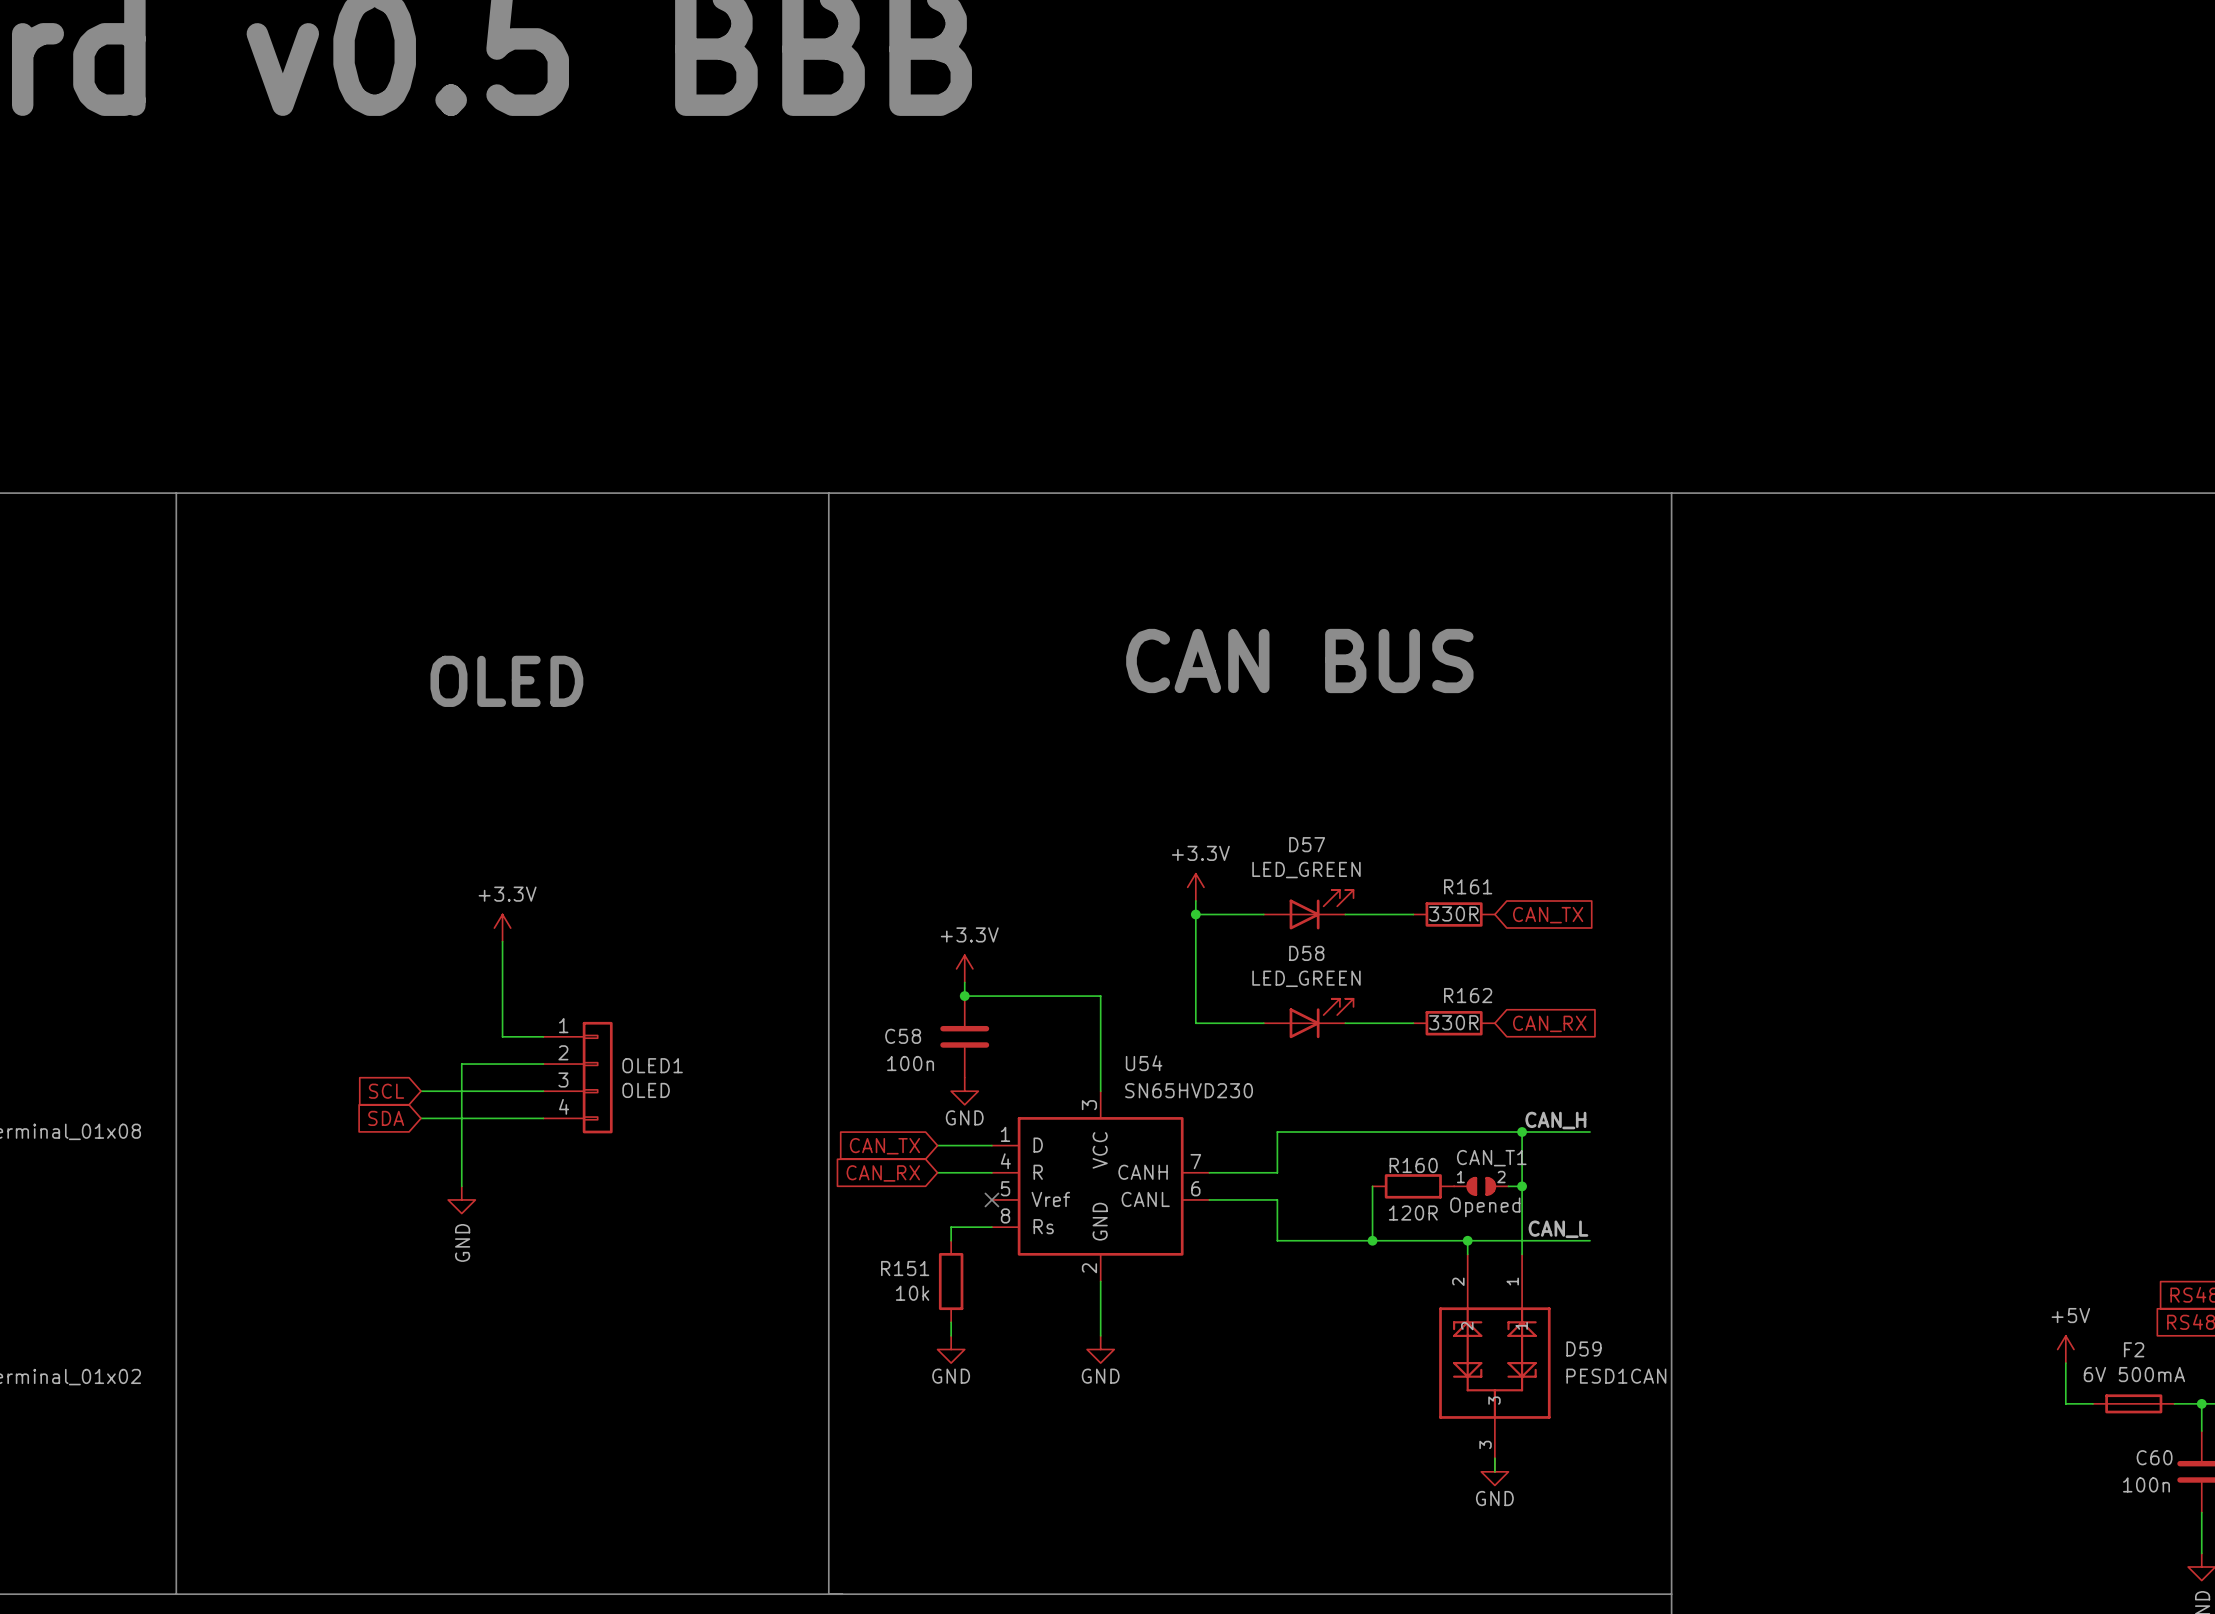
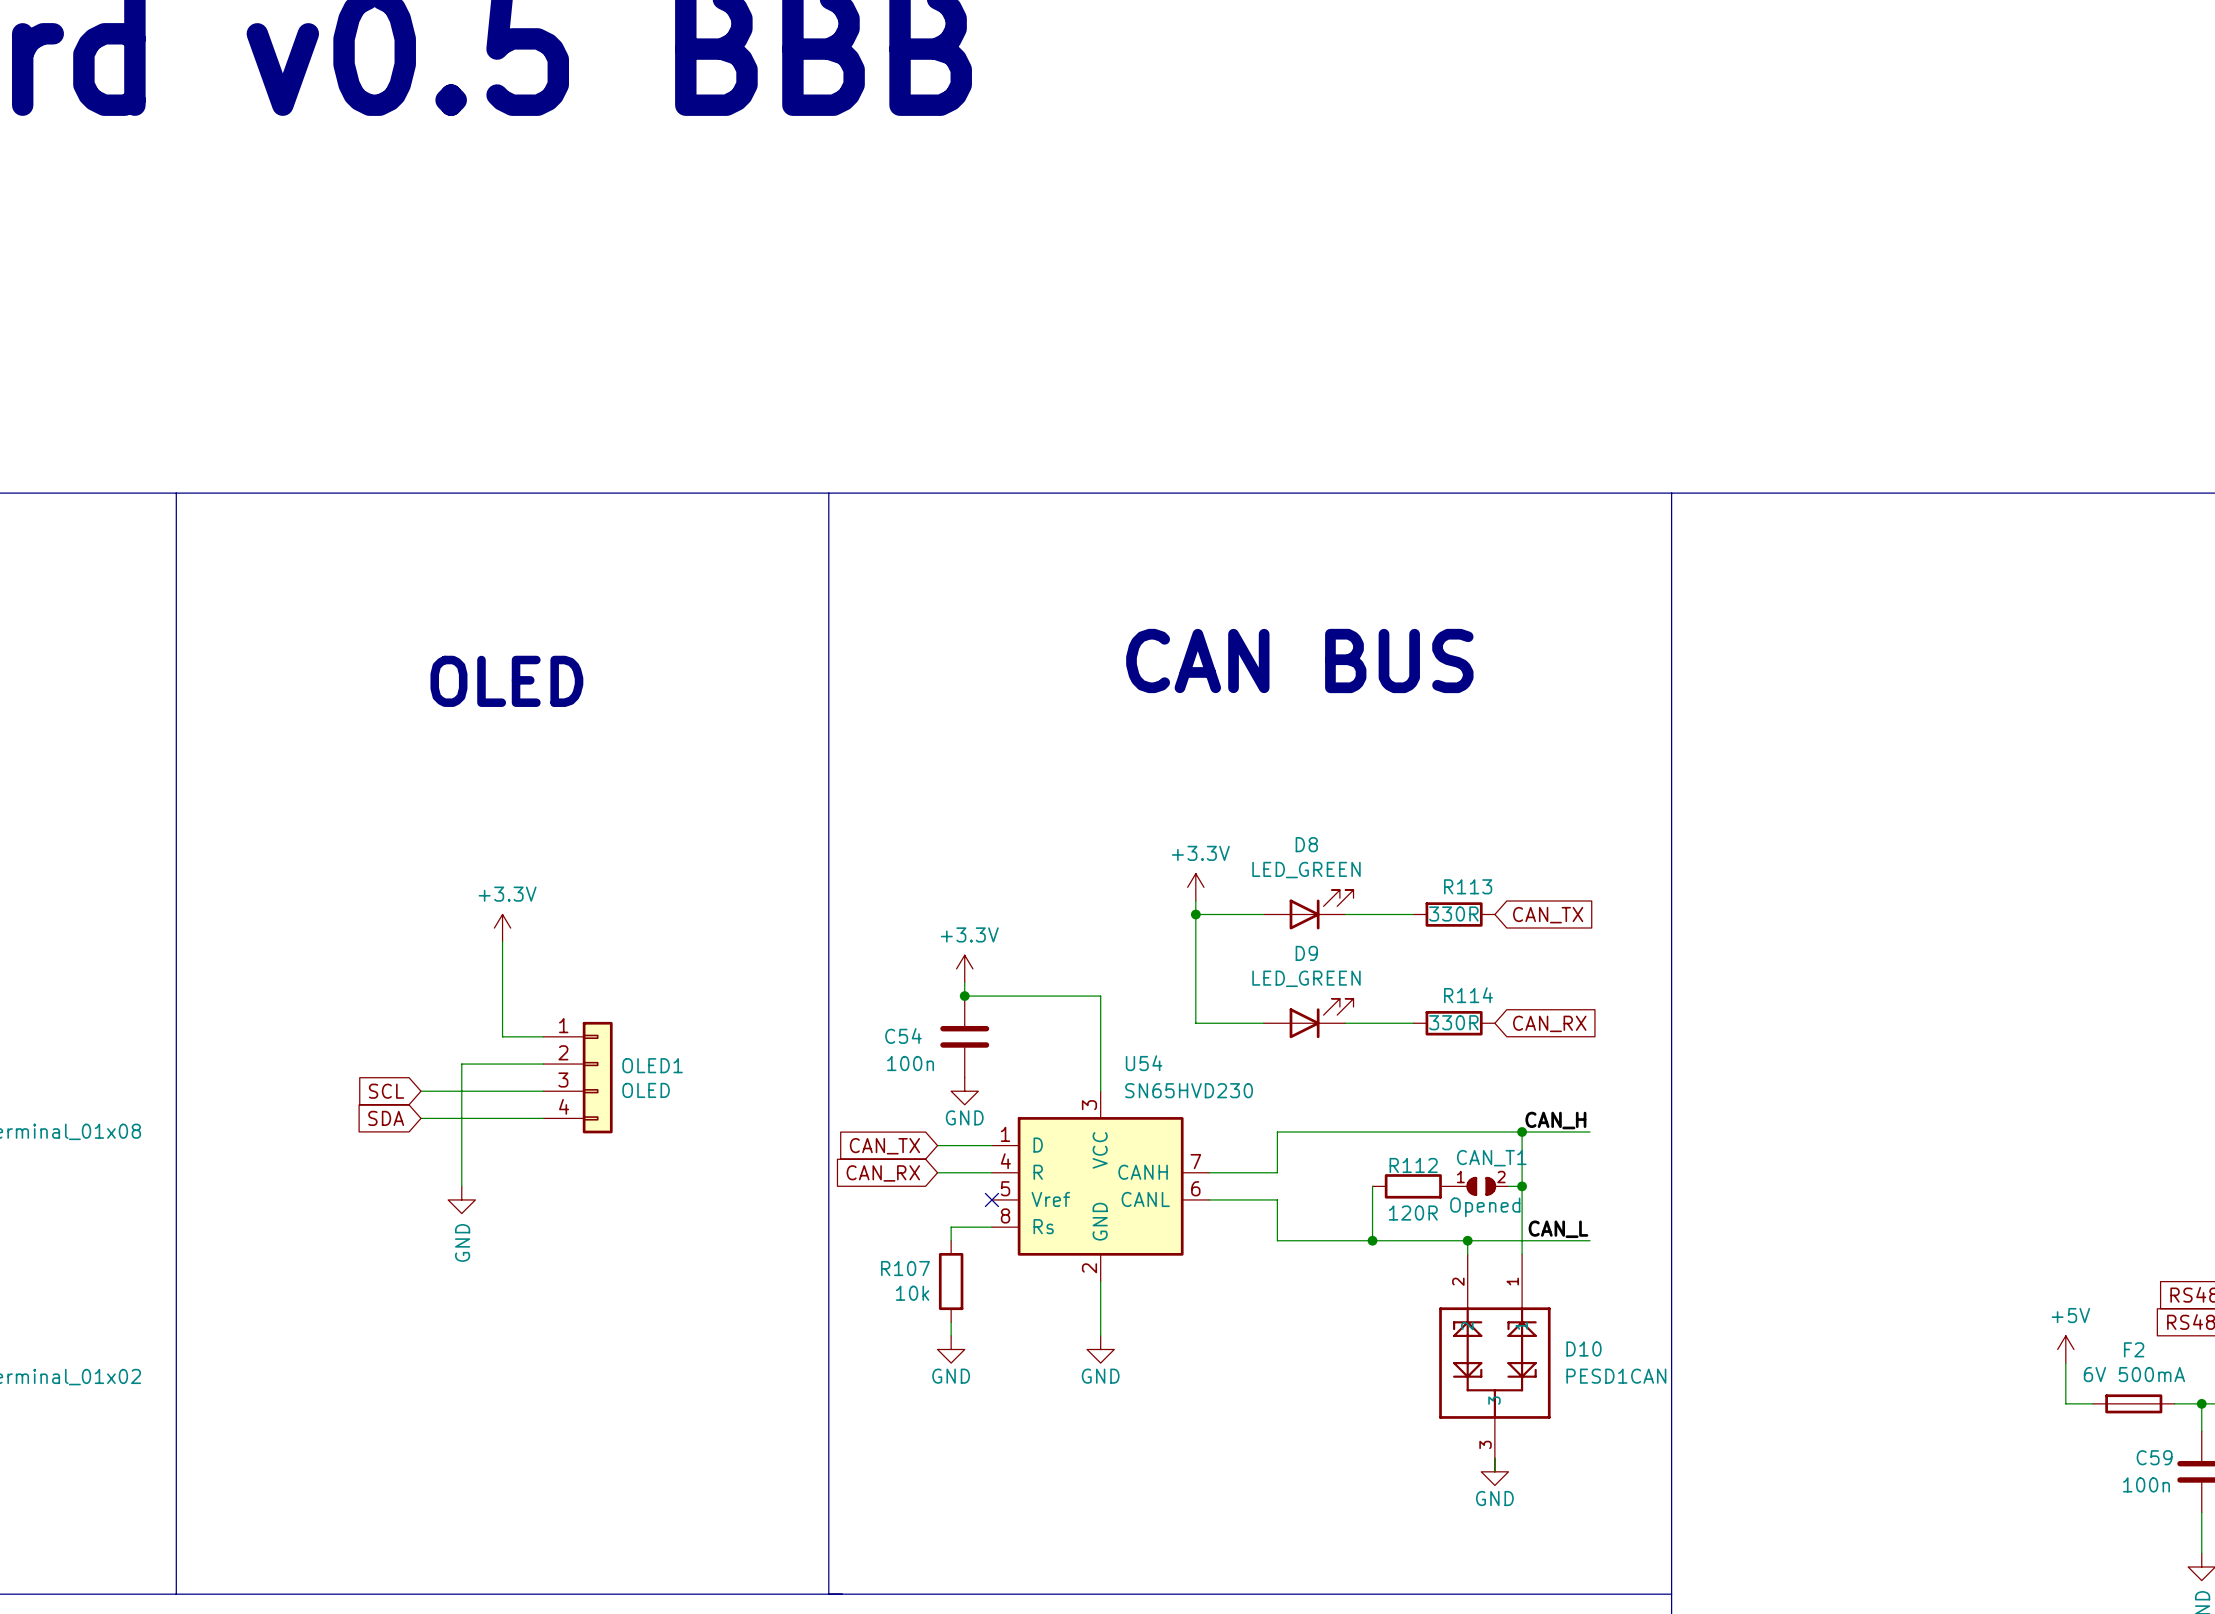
D57 name: D57 (1307, 844) -> D8 (1306, 844)
R161 name: R161 (1468, 886) -> R113 (1468, 886)
D58 name: D58 (1306, 953) -> D9 (1306, 953)
R162 name: R162 (1468, 995) -> R114 (1468, 995)
C58 name: C58 (903, 1036) -> C54 (903, 1036)
R160 name: R160 (1413, 1165) -> R112 (1413, 1165)
R151 name: R151 (905, 1268) -> R107 (905, 1268)
D59 name: D59 (1583, 1348) -> D10 (1583, 1348)
C60 name: C60 (2154, 1457) -> C59 (2154, 1457)

